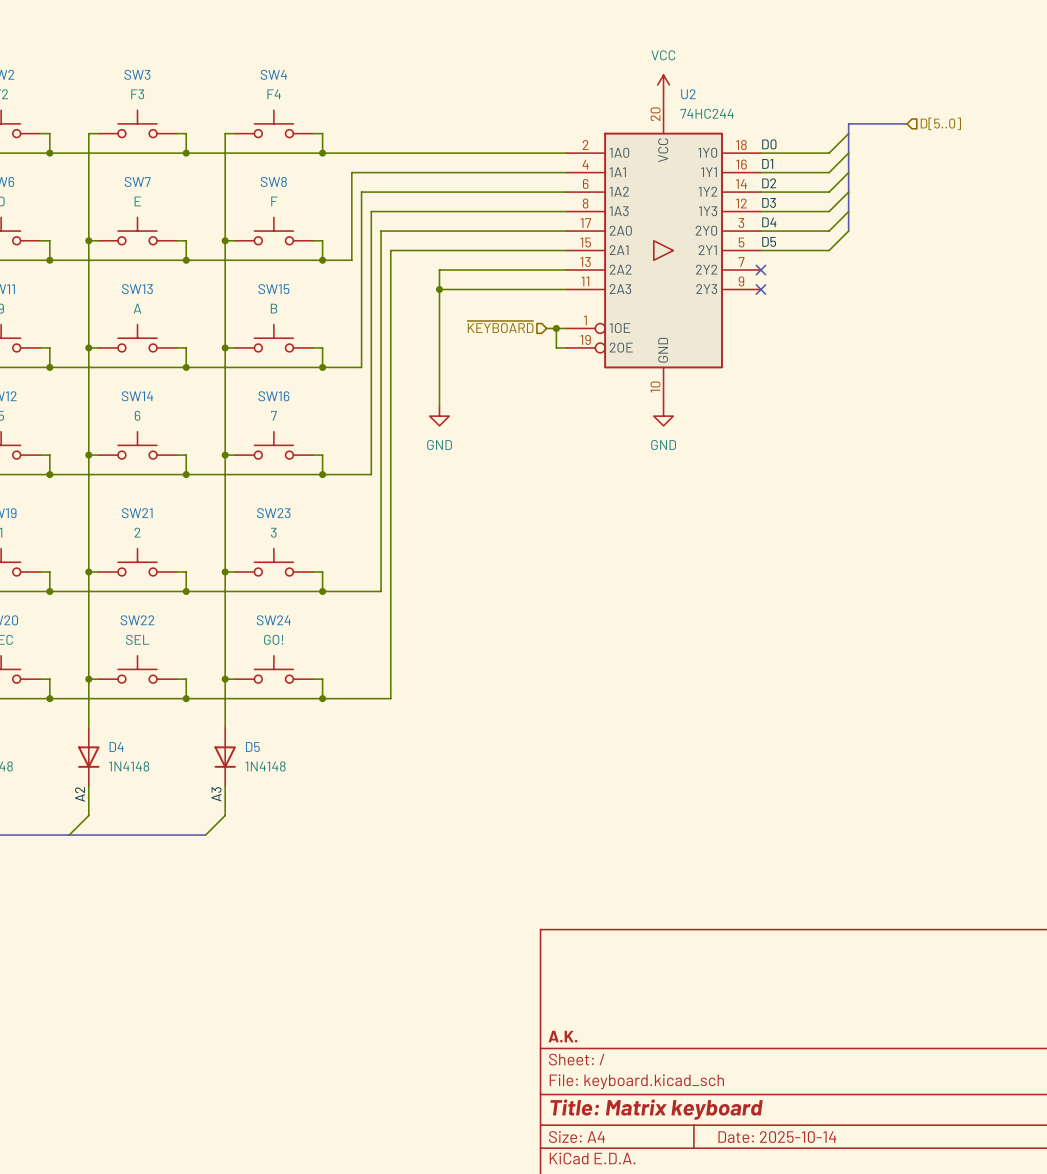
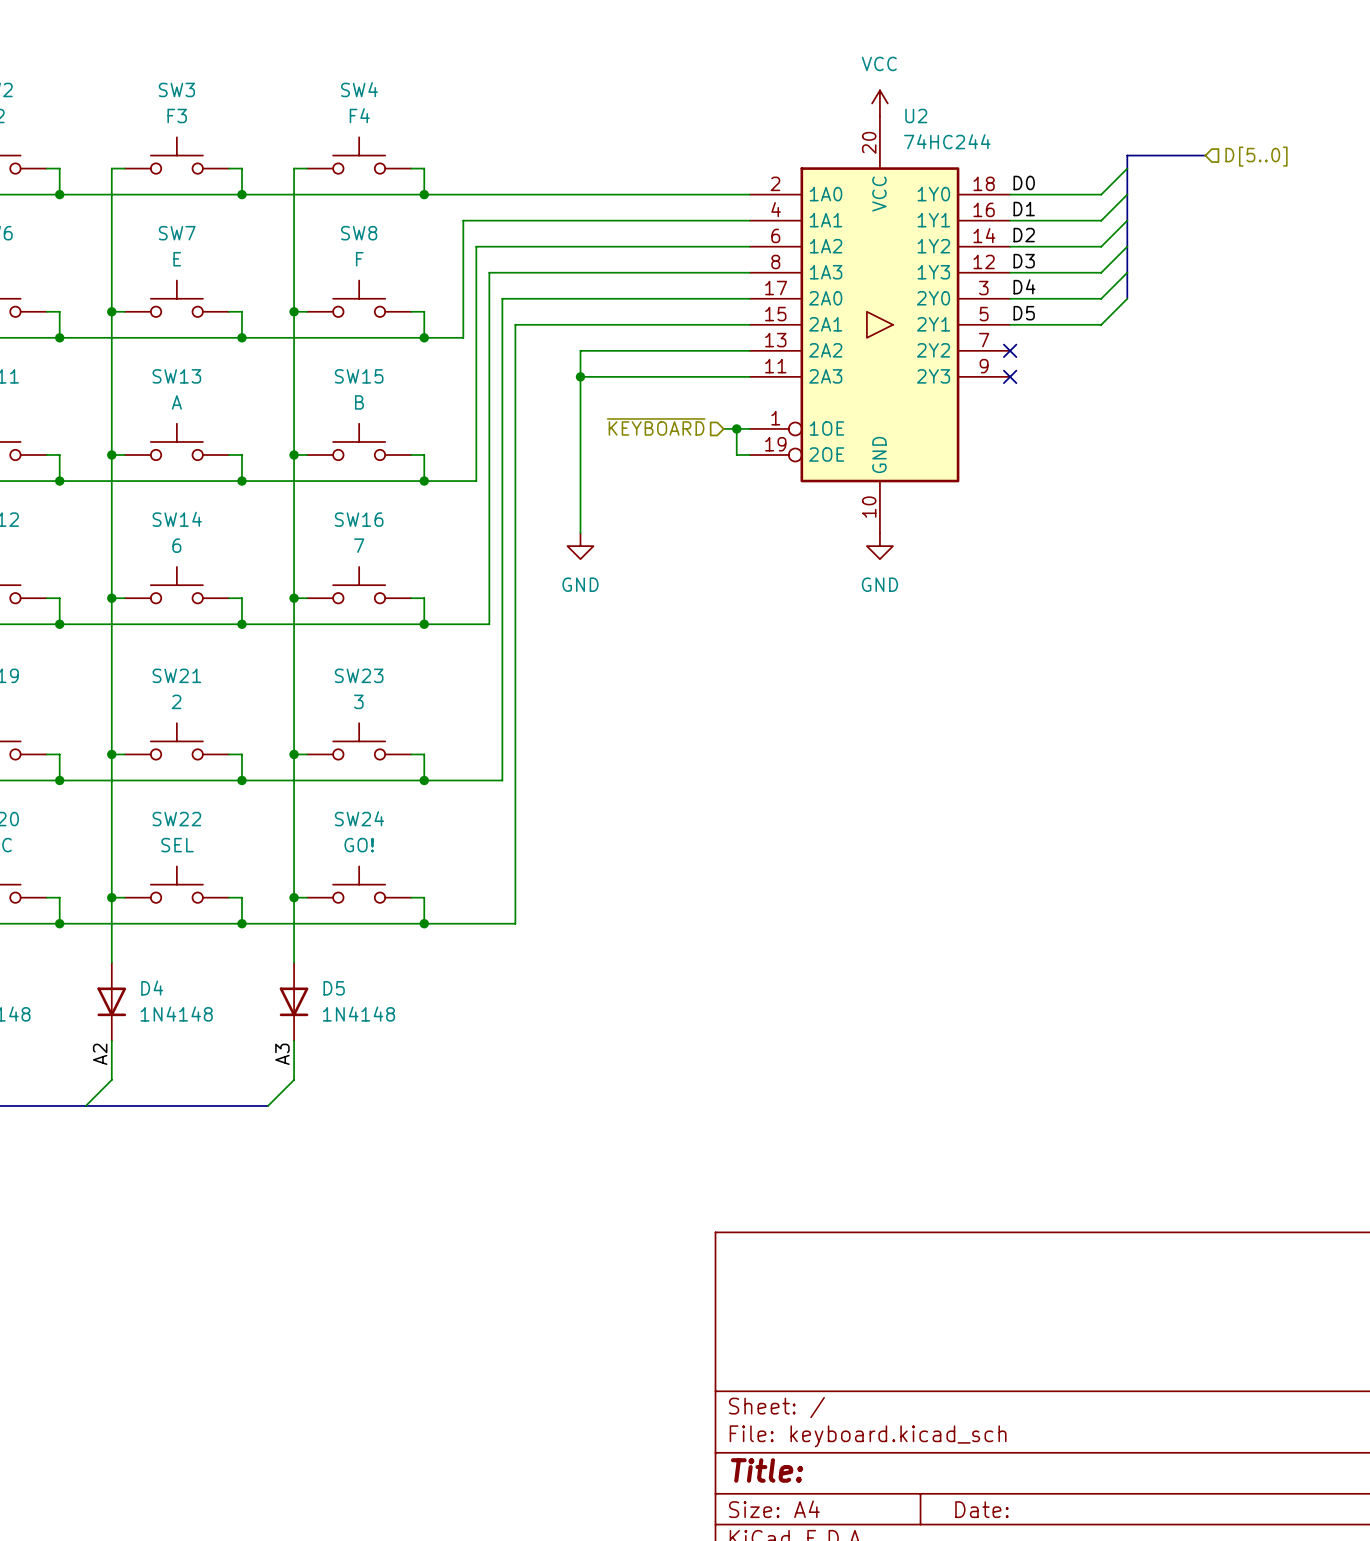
title block: A.K. (562, 1036) -> none
title block: Title: Matrix keyboard (656, 1109) -> Title: (767, 1470)
title block: Date: 2025-10-14 (777, 1137) -> Date: (981, 1509)

